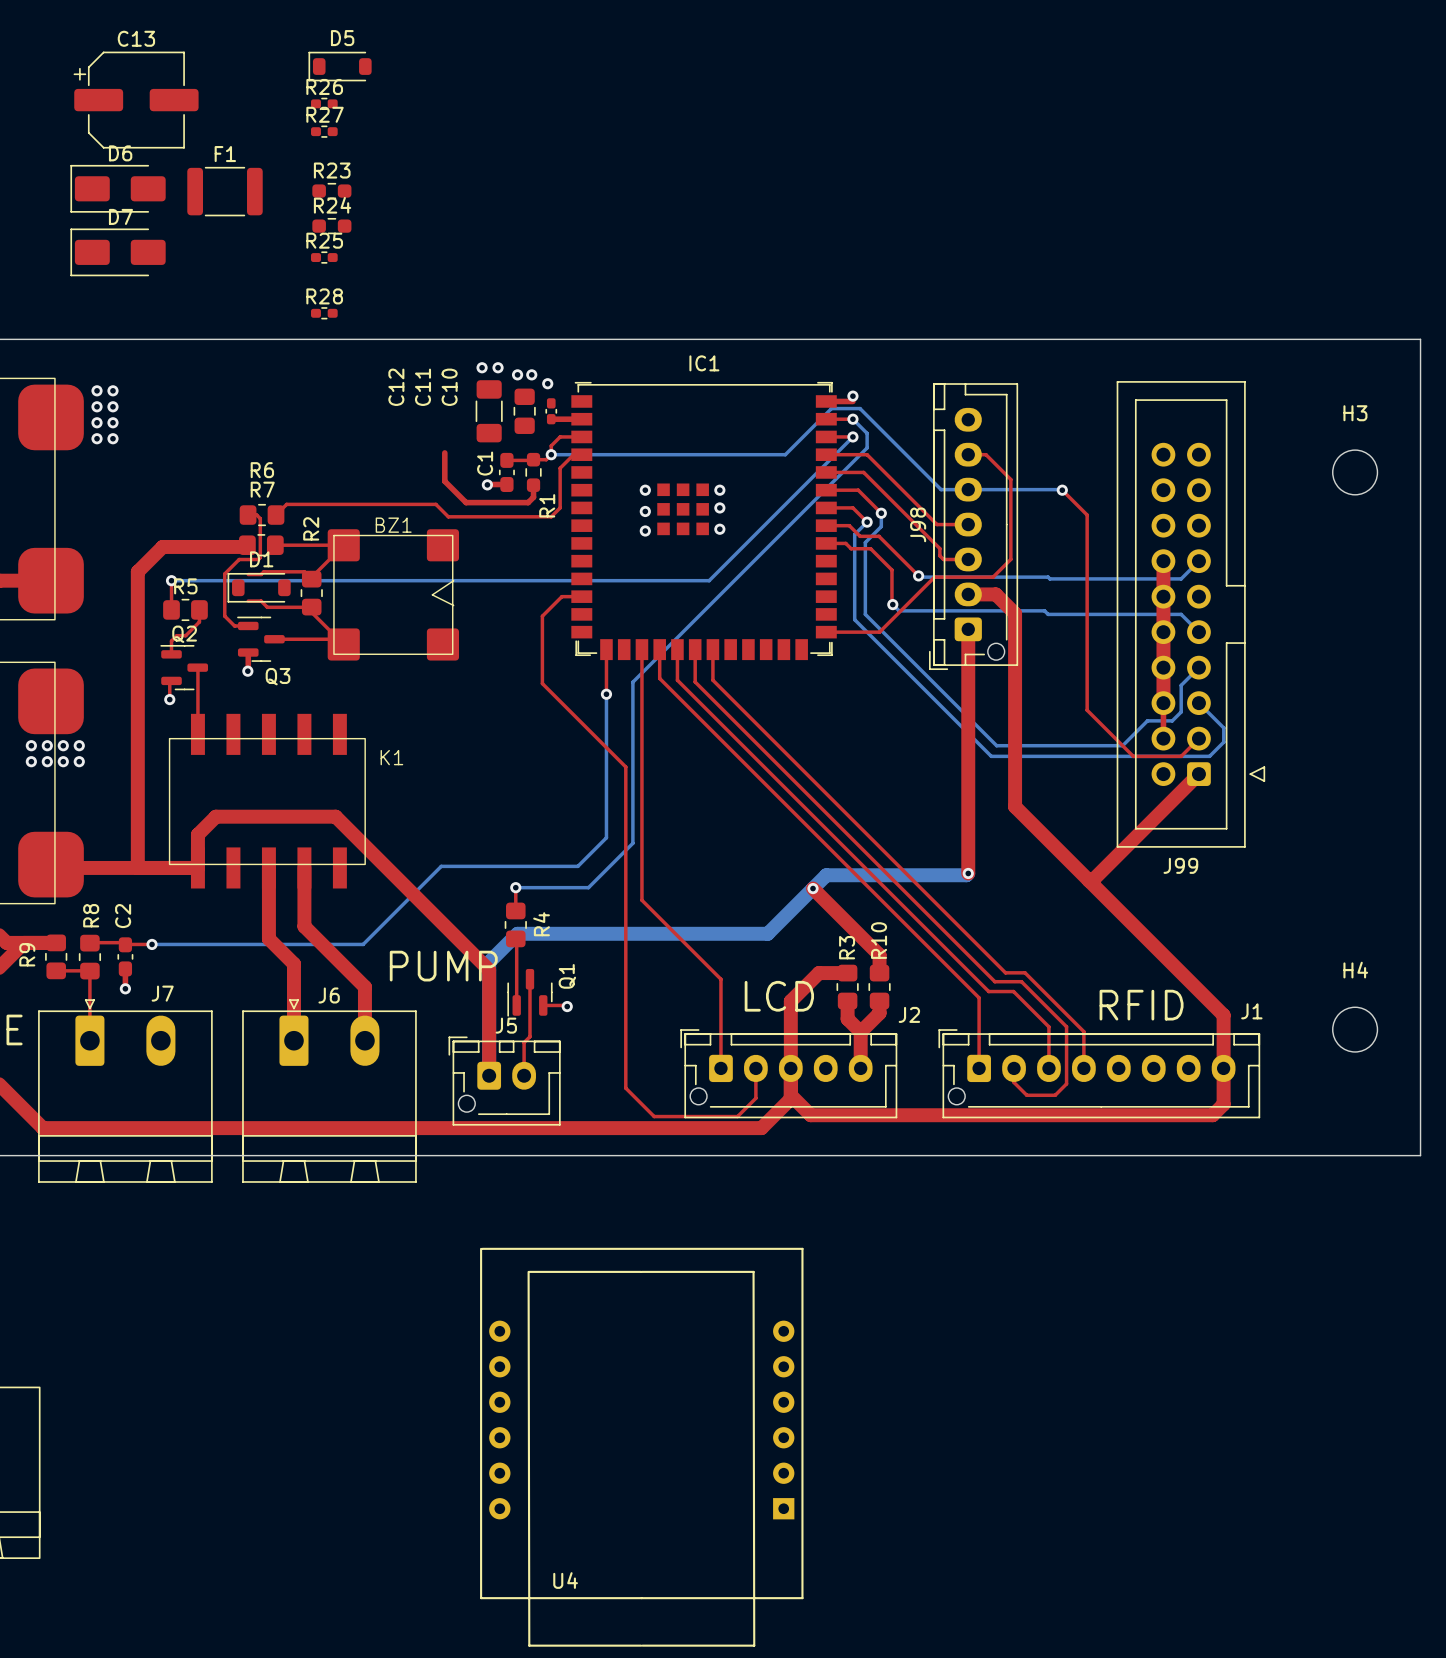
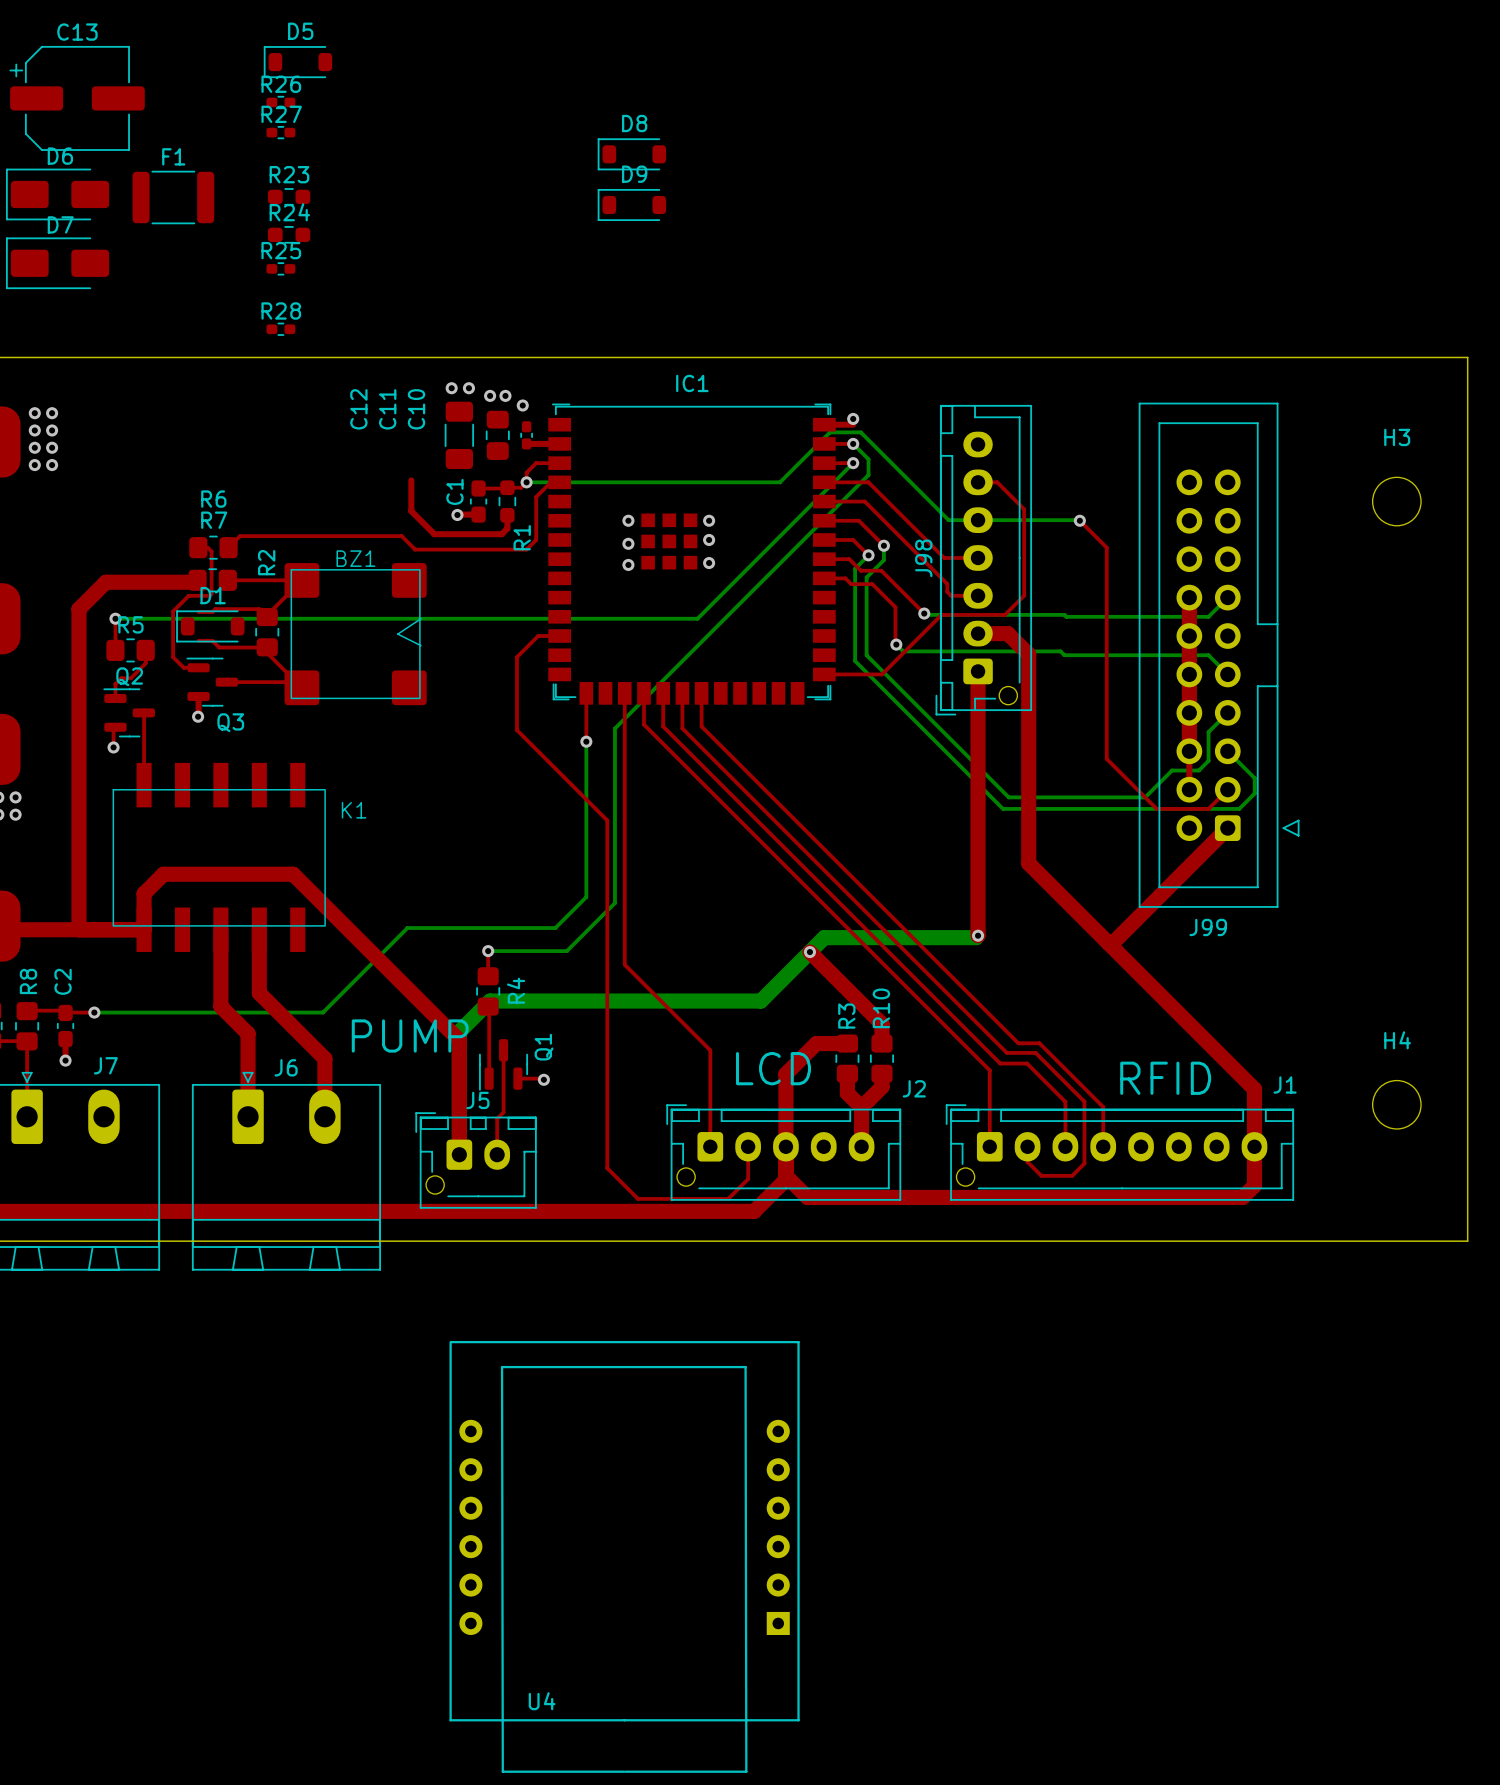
D8: none -> (631, 154)
D9: none -> (631, 205)

